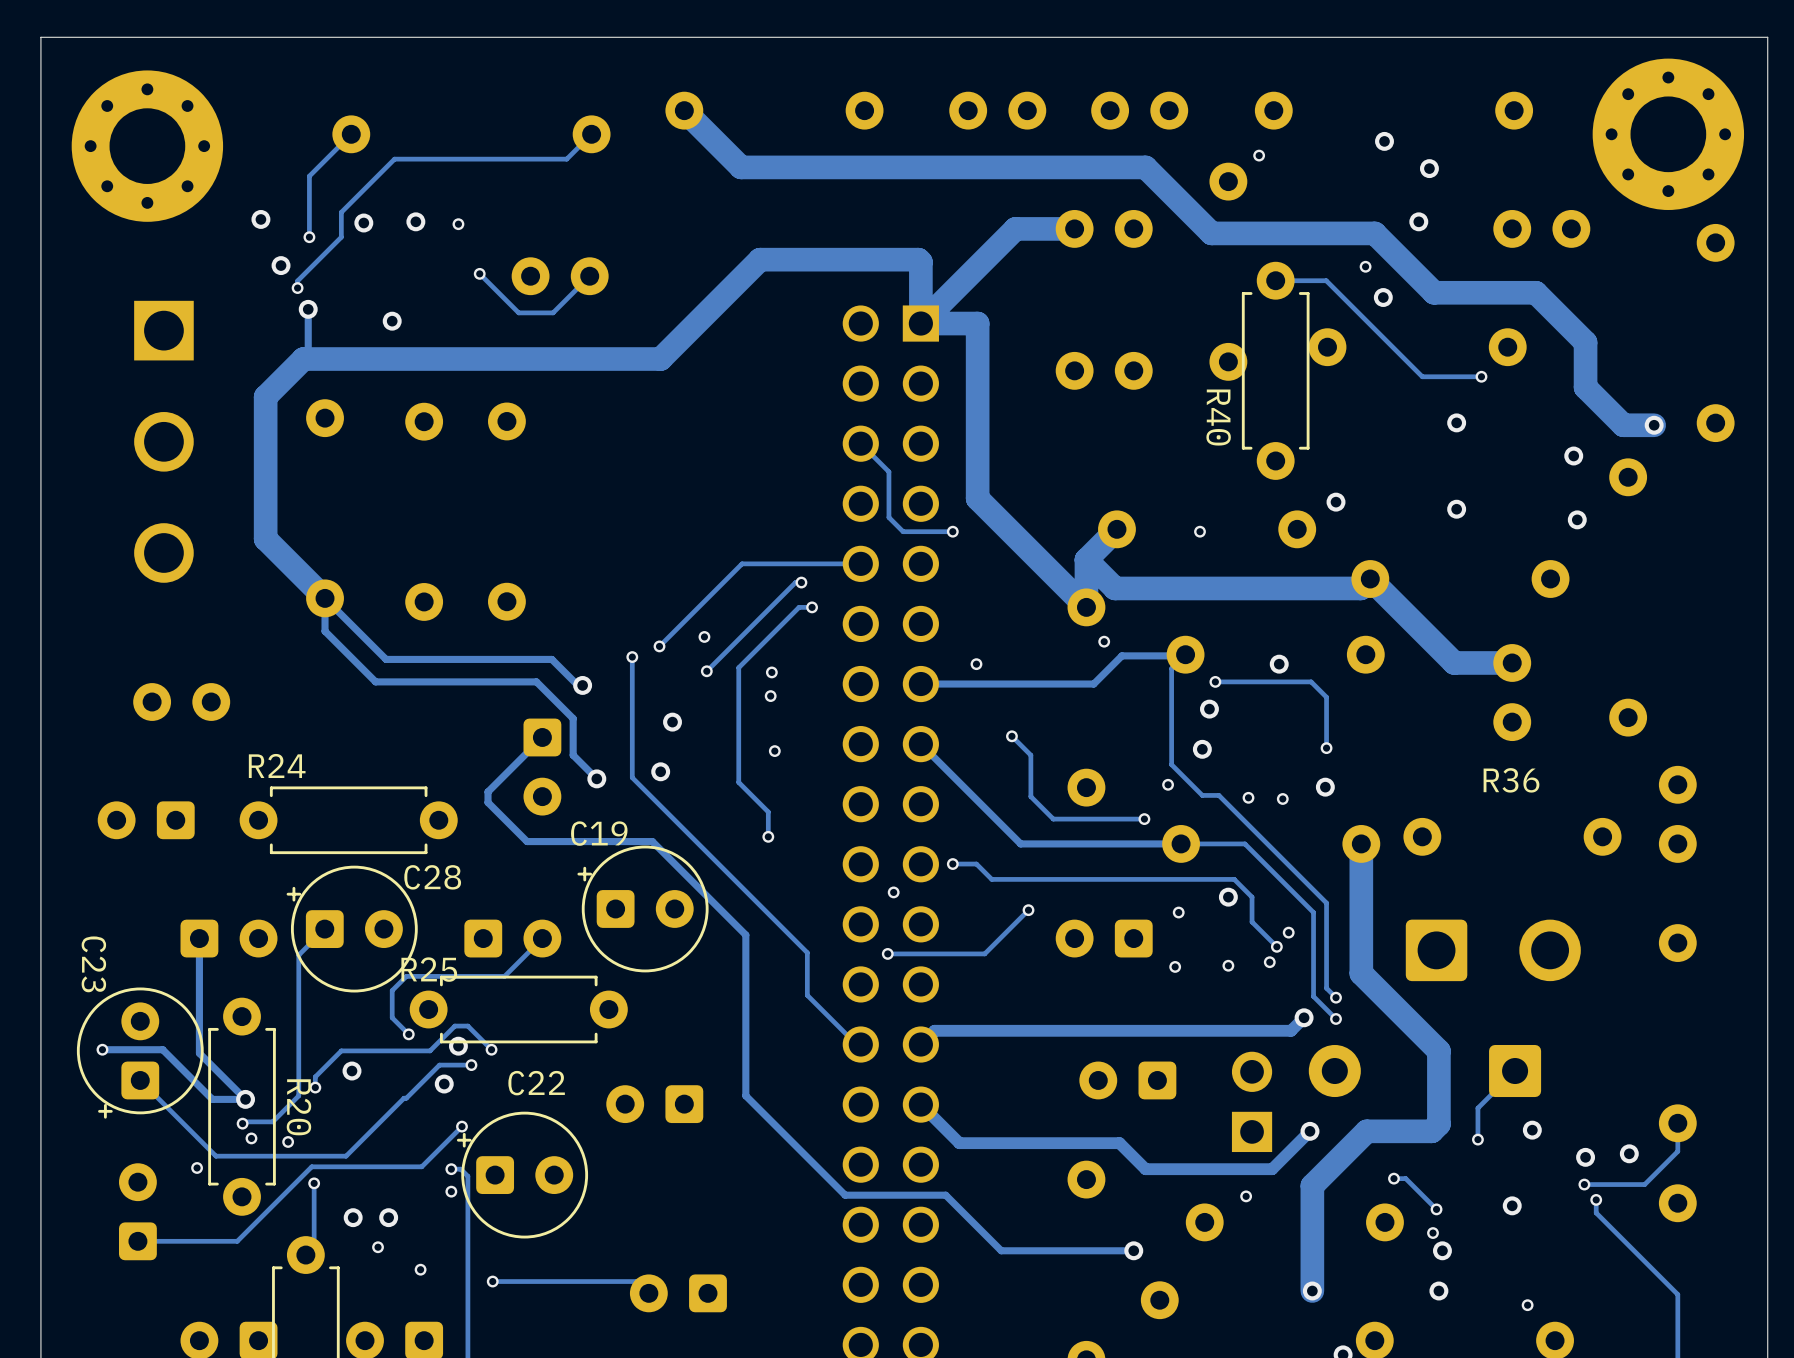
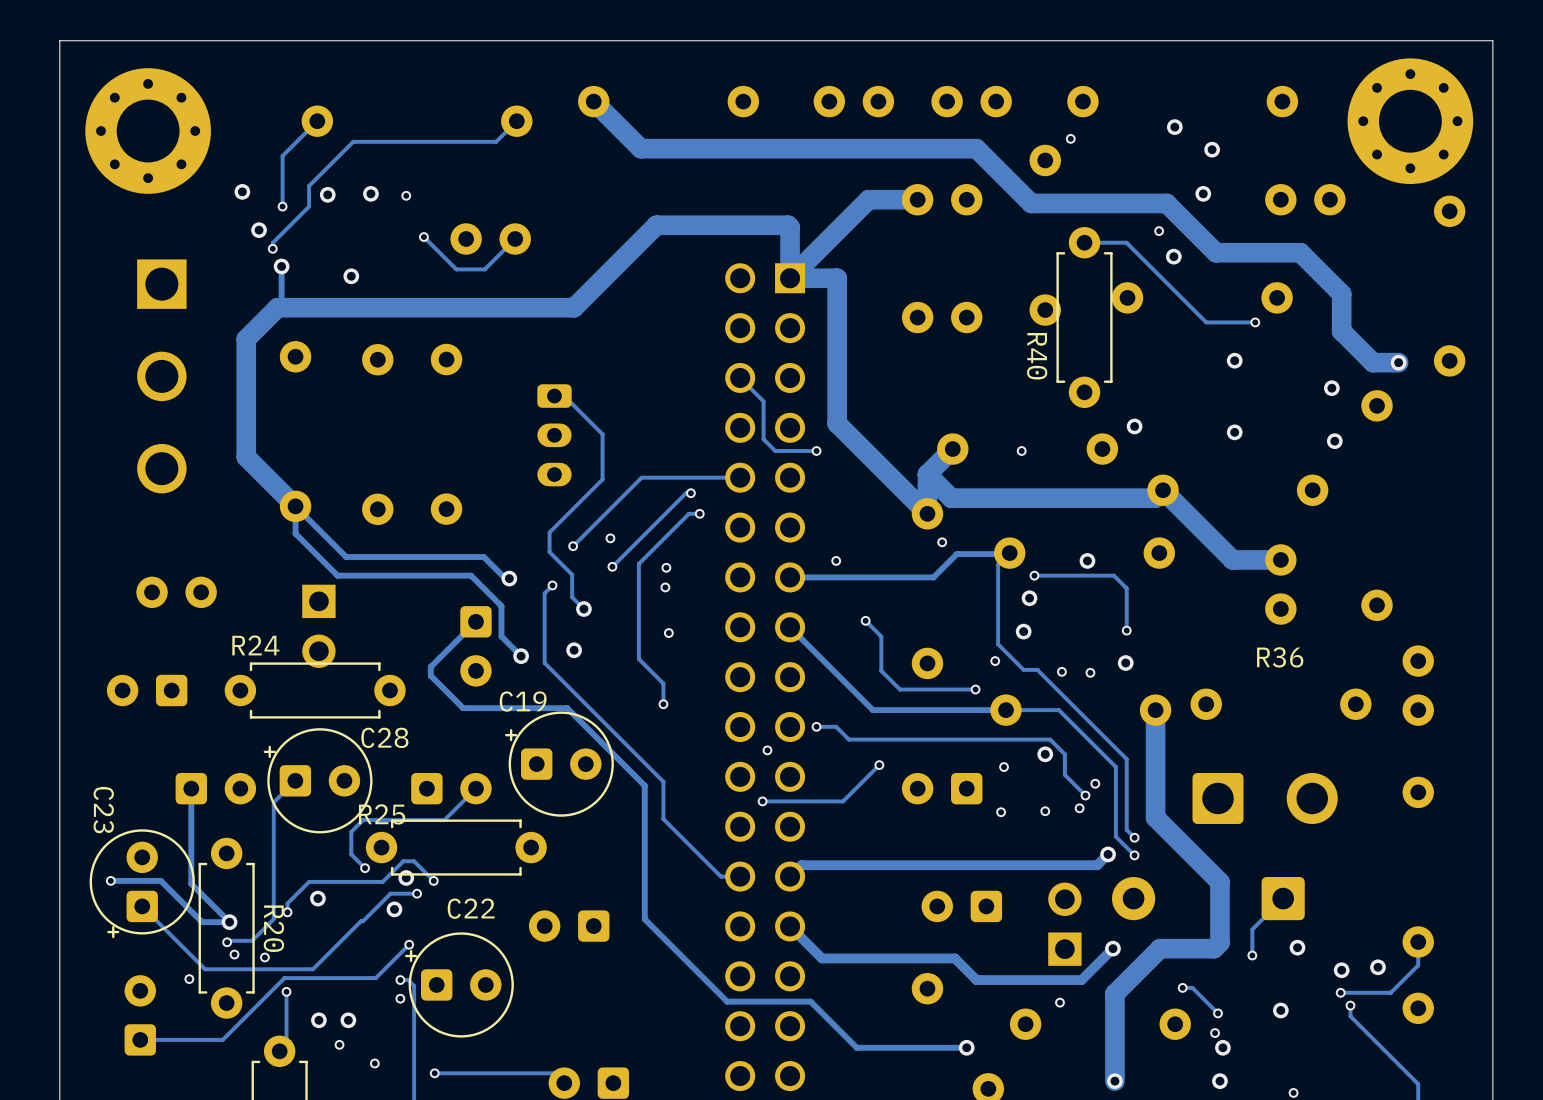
track: none -> (554, 396) (564, 396) (602, 434) (602, 479) (549, 532) (549, 552) (572, 574) (572, 597) (583, 609)
part: none -> (554, 435)
track: (632, 657) (632, 777) (807, 952) (807, 995) (856, 1044) -> (552, 585) (544, 593) (544, 663) (663, 781) (663, 819) (720, 876) (736, 876)
via position: (632, 657) -> (552, 585)
part: none -> (318, 626)

